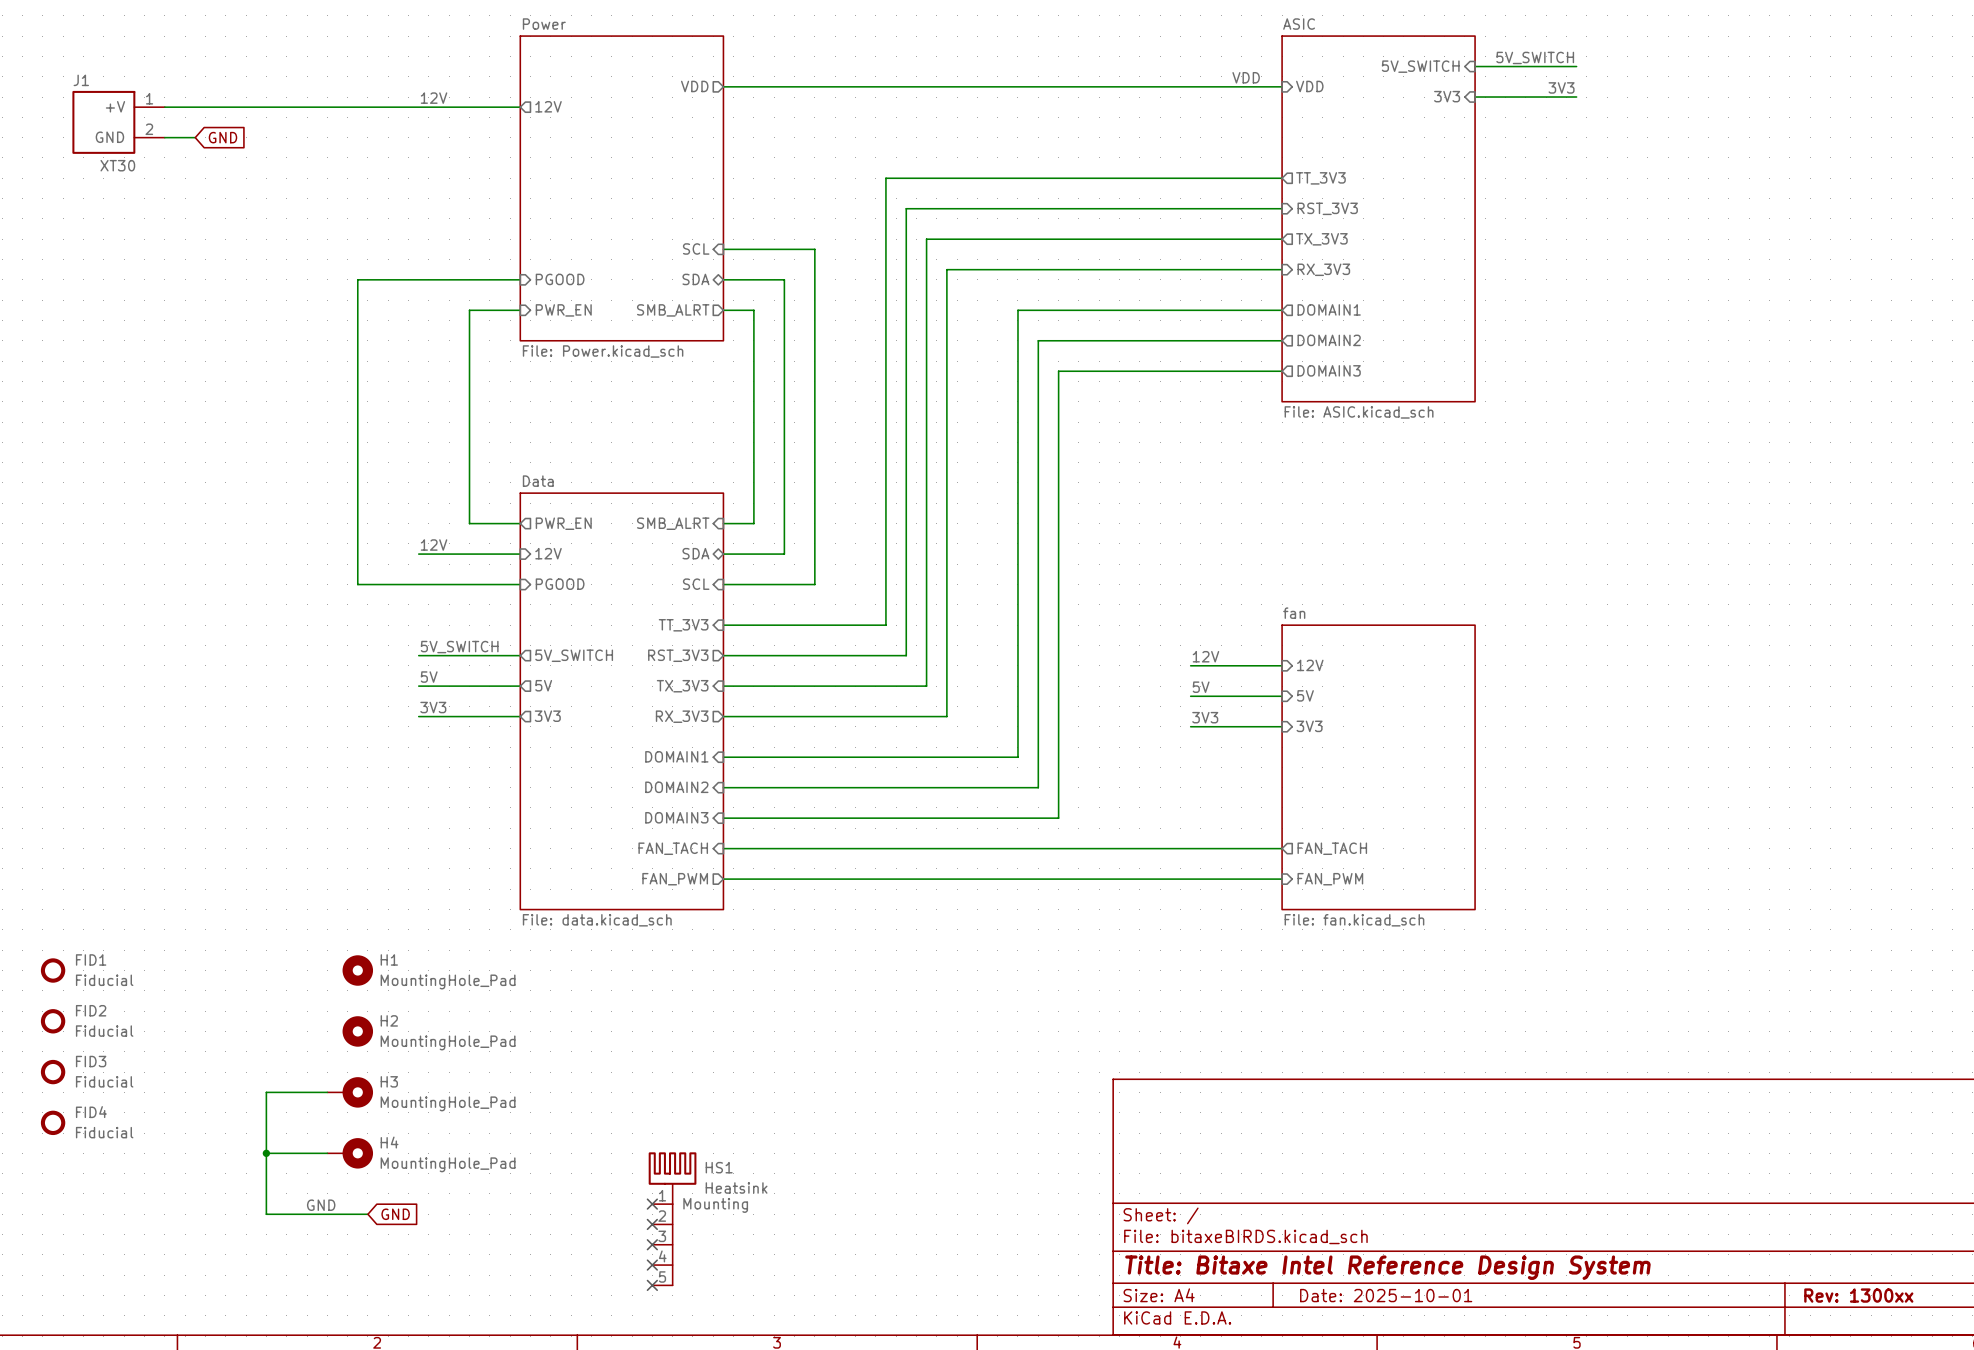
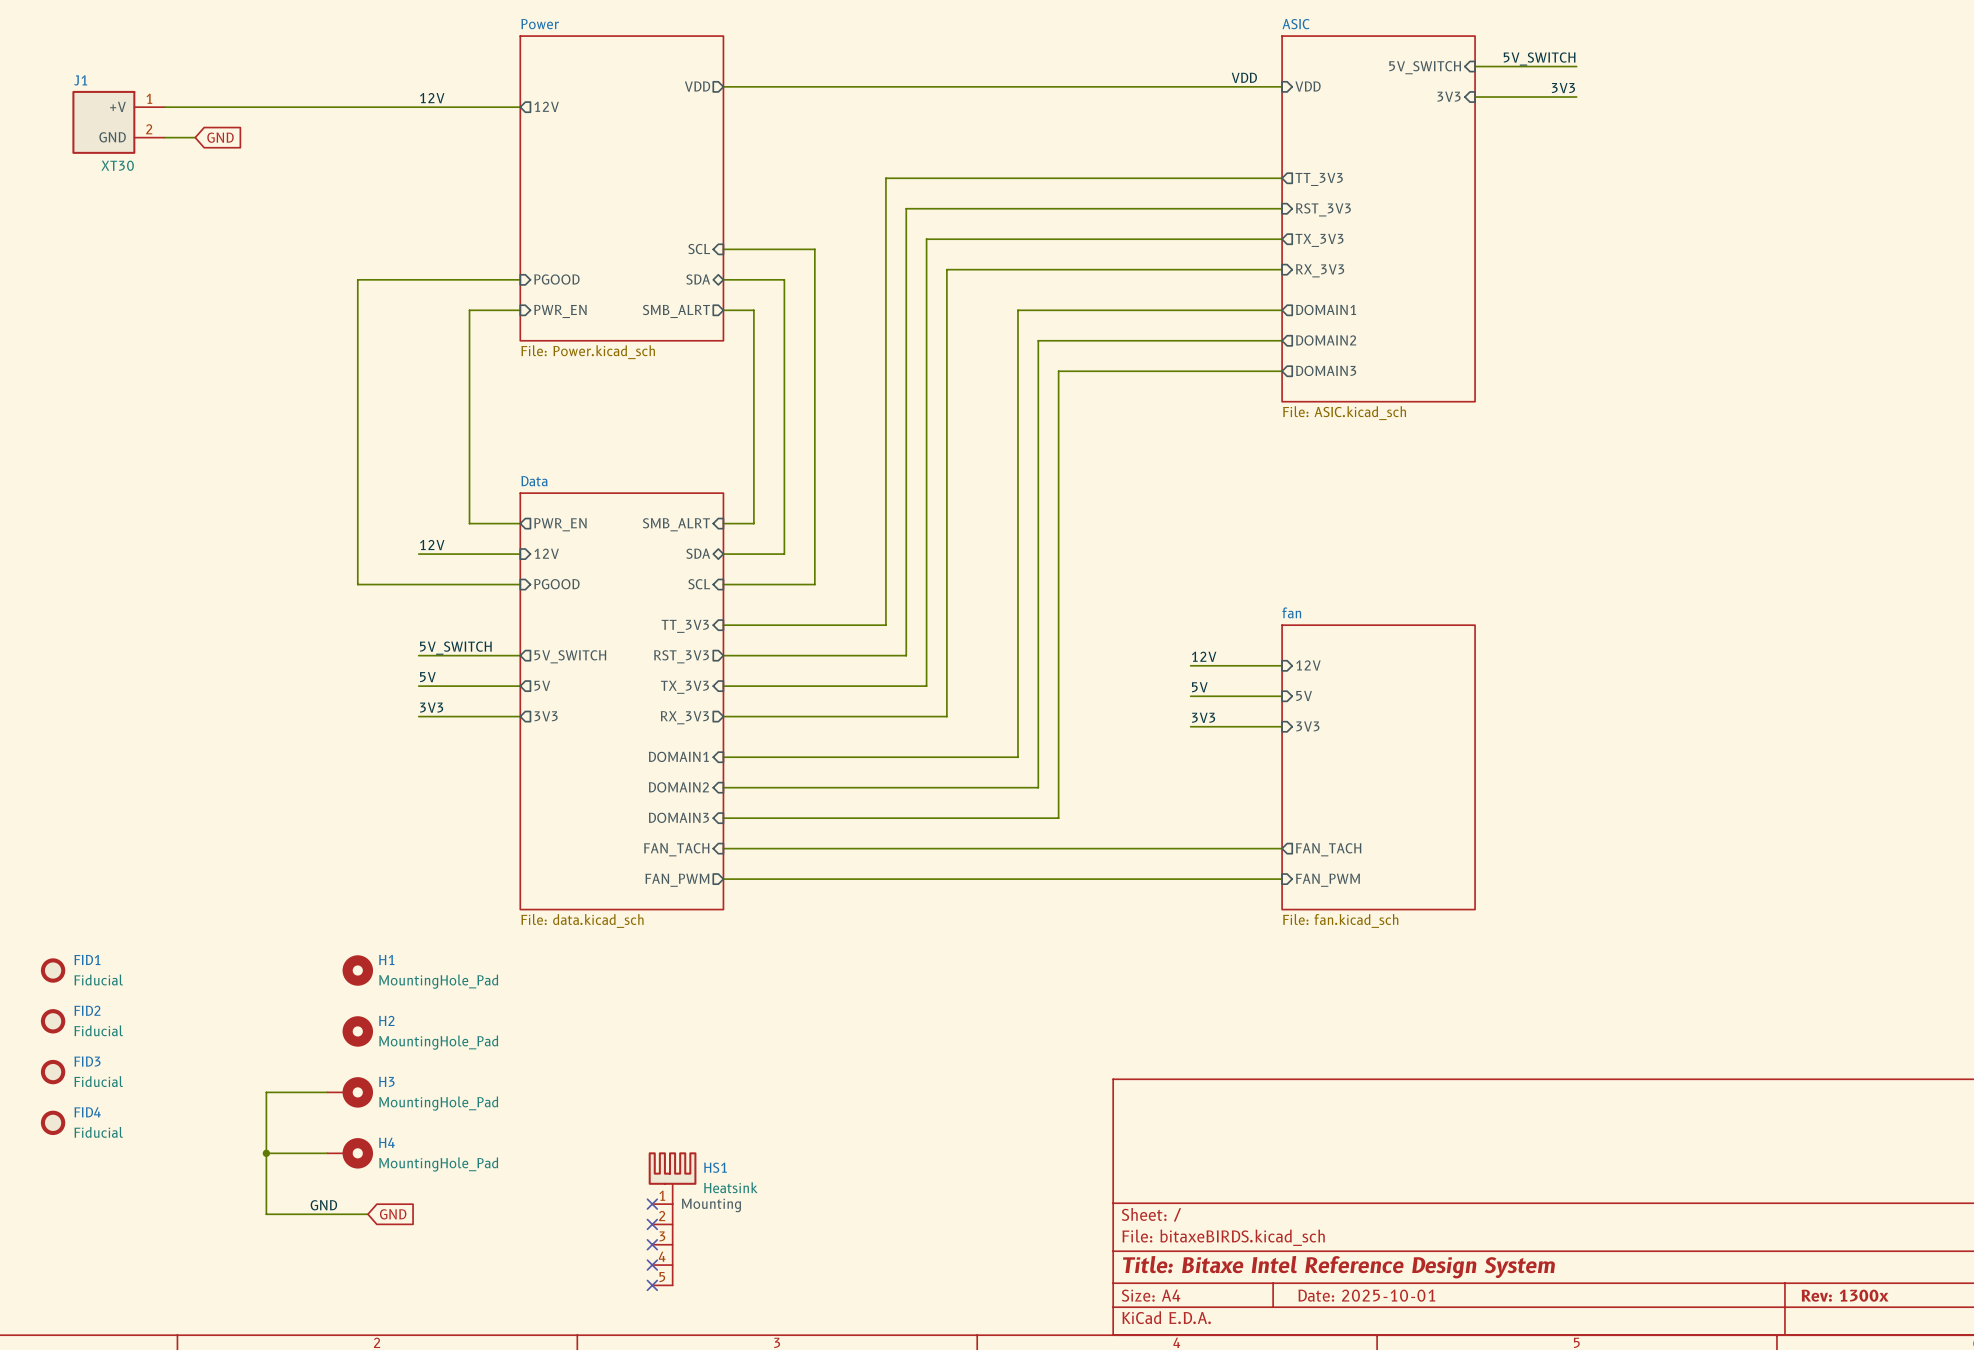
title block: Rev: 1300xx (1858, 1295) -> Rev: 1300x (1845, 1295)

